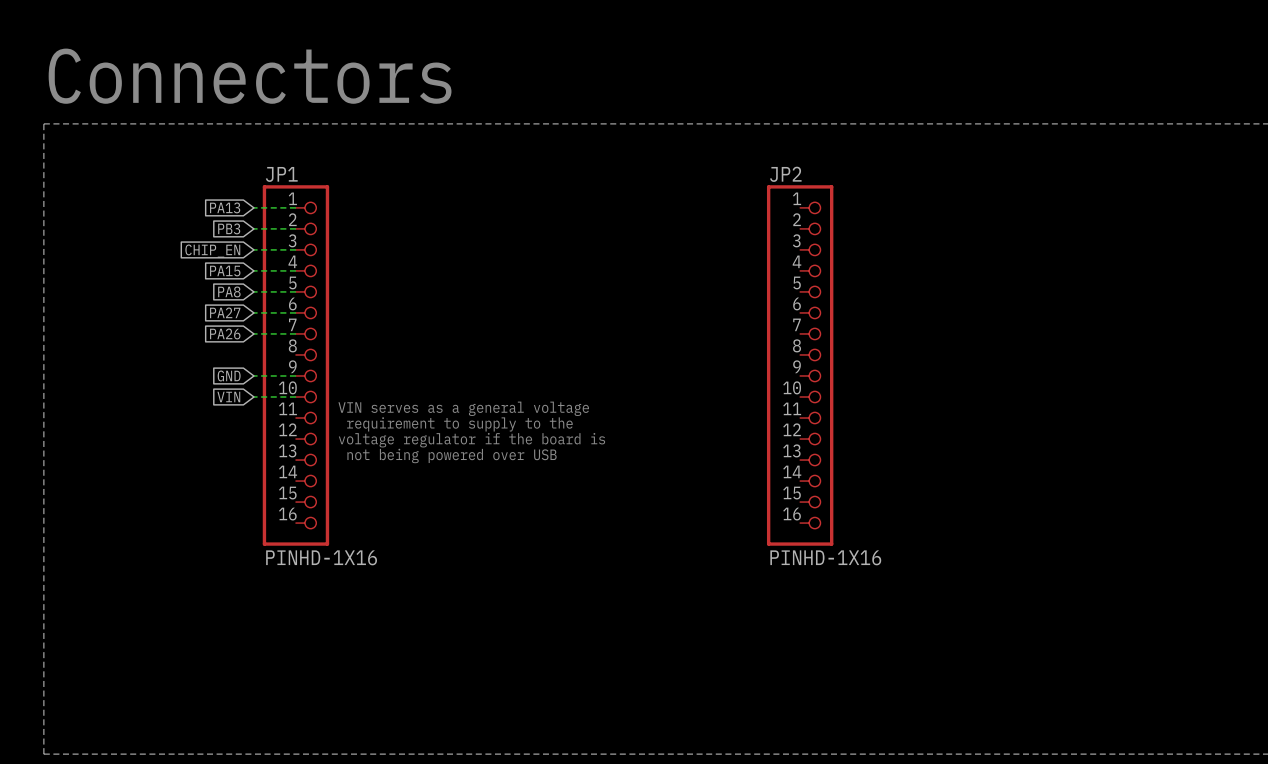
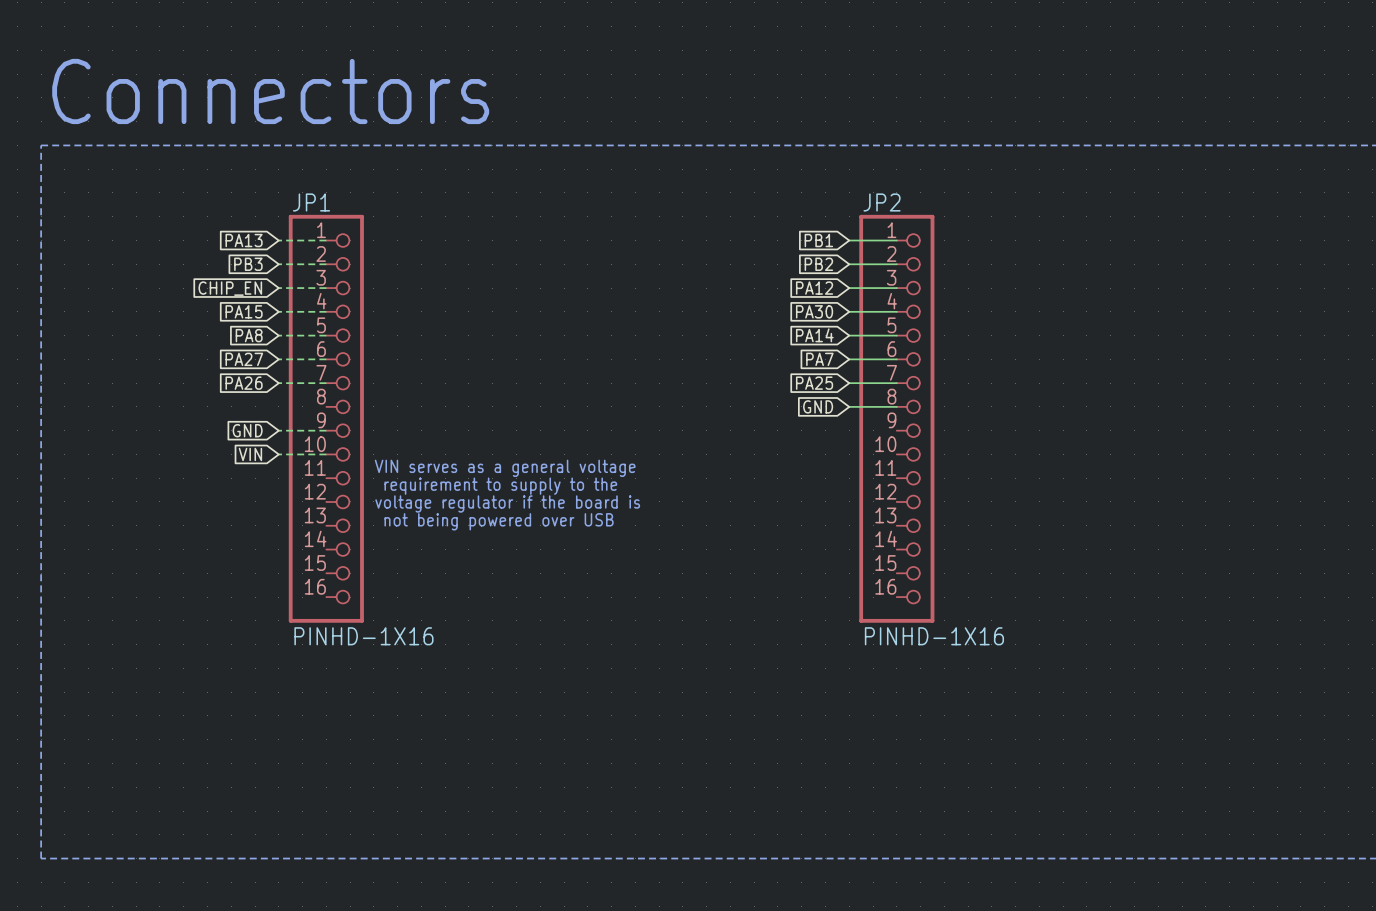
global label: none -> PB1 (818, 240)
wire: none -> (849, 240) (896, 240)
global label: none -> PB2 (818, 264)
wire: none -> (849, 264) (896, 264)
global label: none -> PA12 (814, 288)
wire: none -> (849, 288) (896, 288)
global label: none -> PA30 (814, 311)
wire: none -> (849, 311) (896, 311)
global label: none -> PA14 (814, 335)
wire: none -> (849, 335) (896, 335)
global label: none -> PA7 (819, 359)
wire: none -> (849, 359) (896, 359)
global label: none -> PA25 (814, 383)
wire: none -> (849, 383) (896, 383)
global label: none -> GND (818, 406)
wire: none -> (849, 406) (896, 406)

